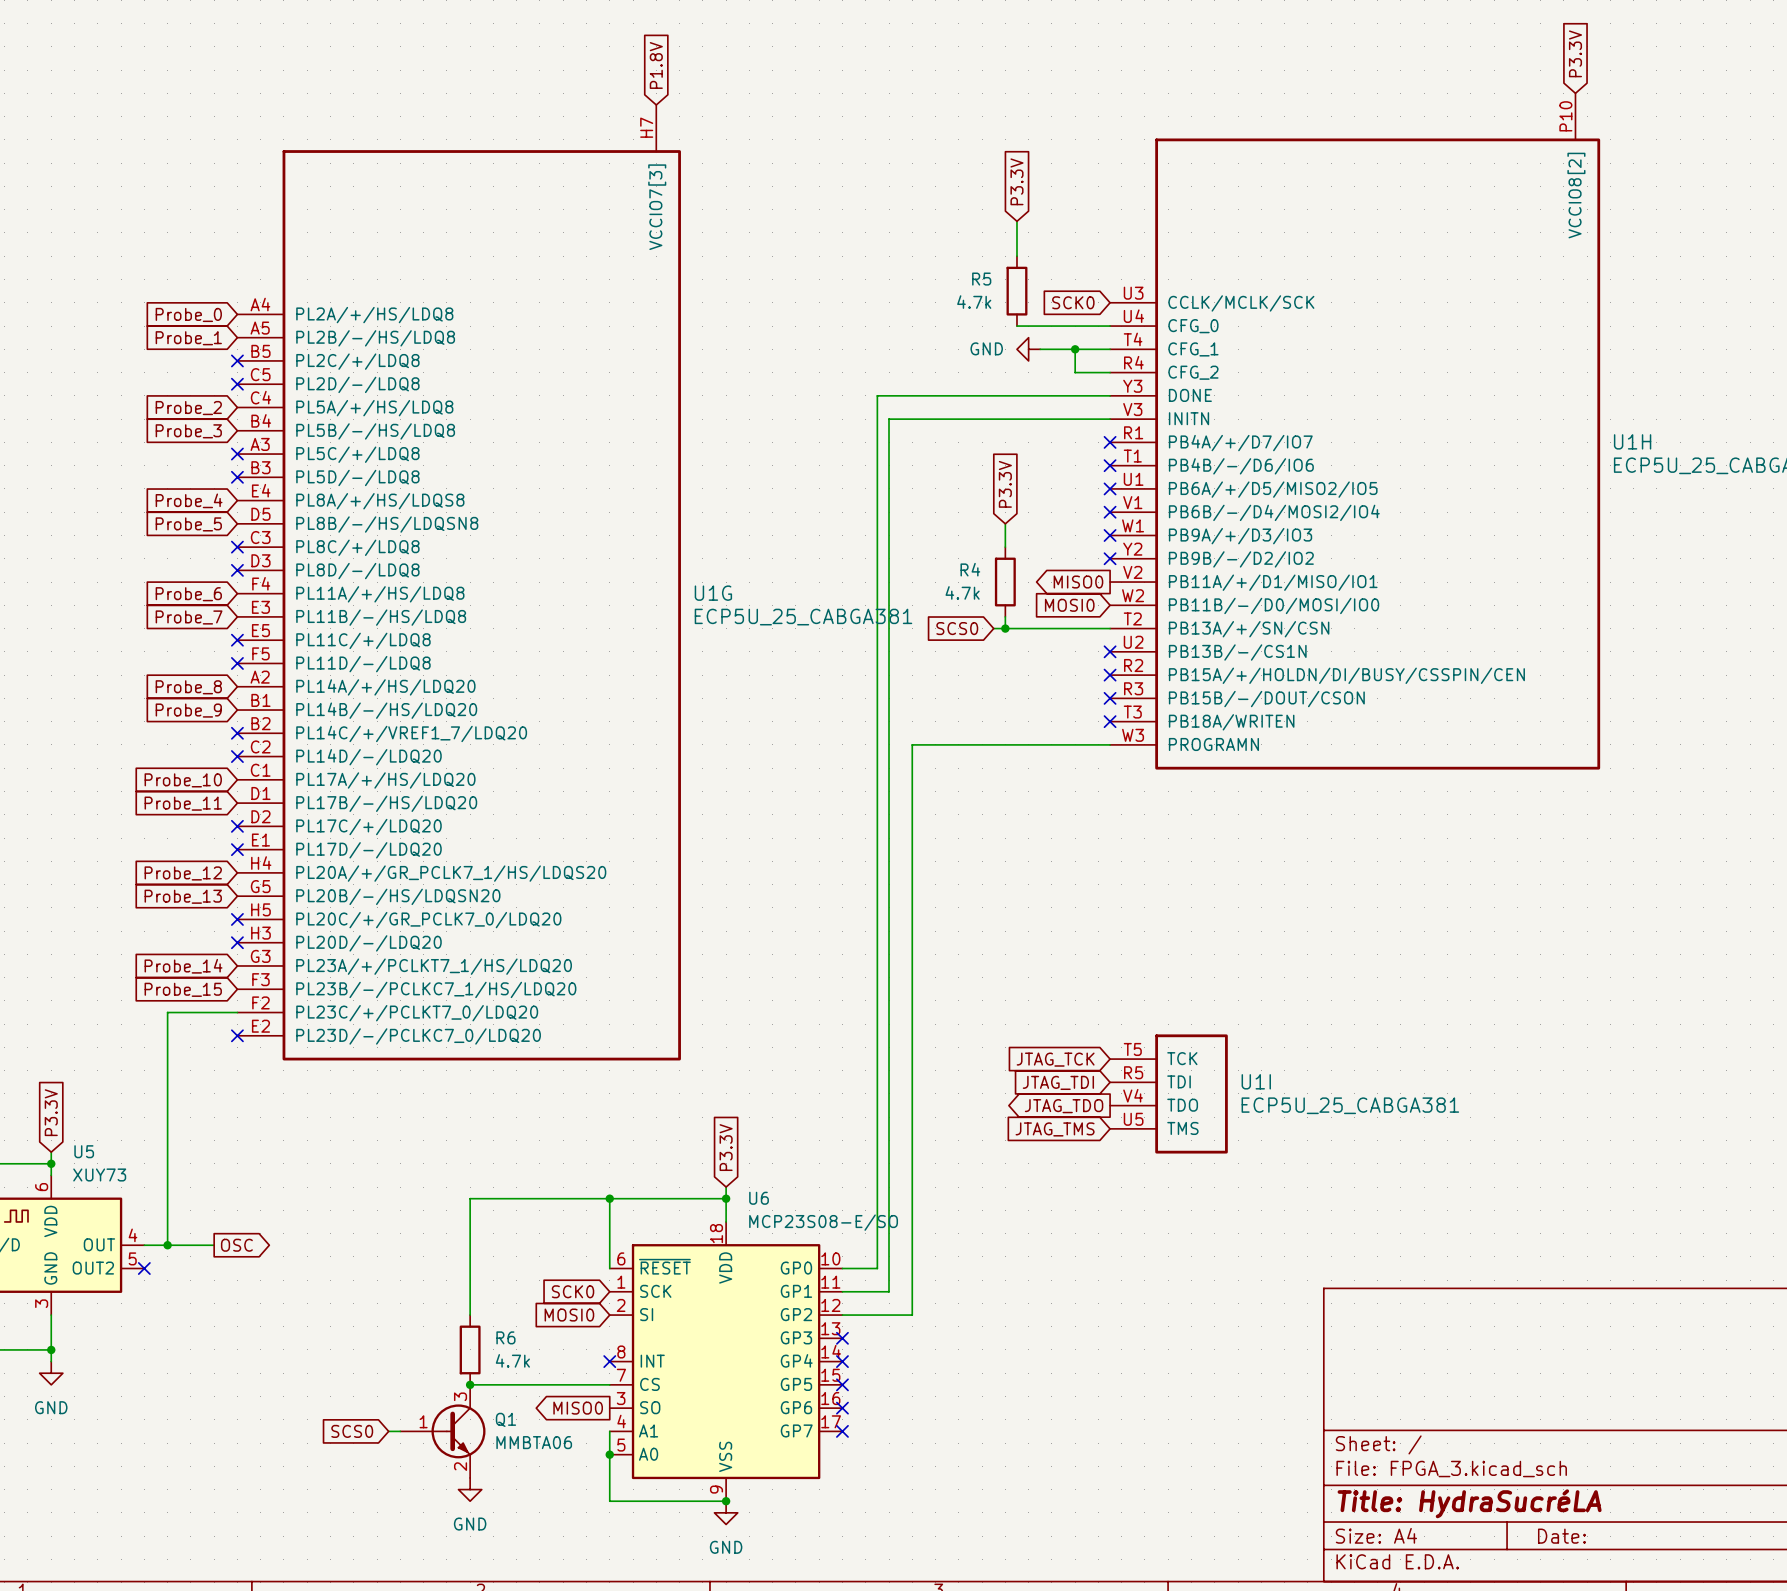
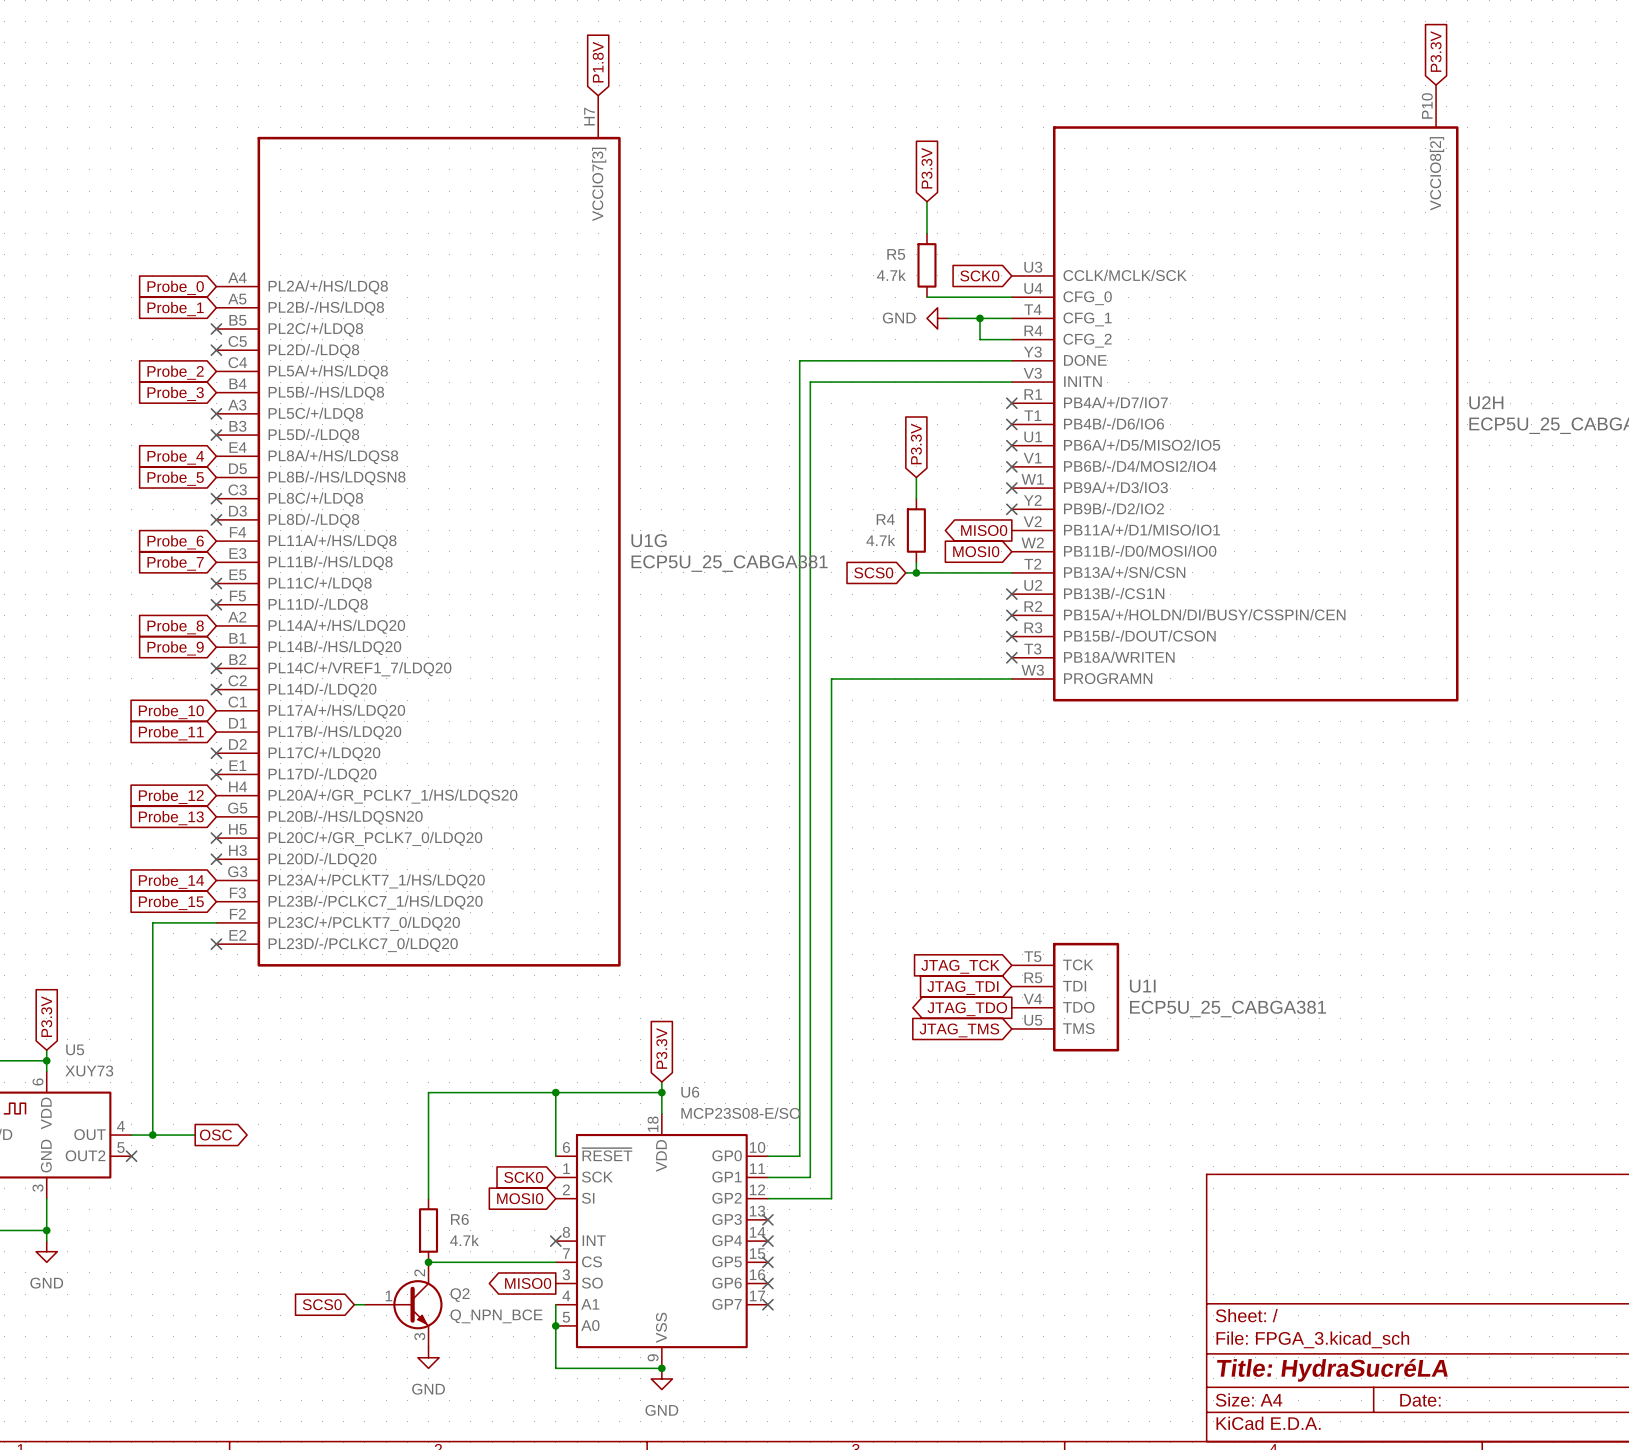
U1H name: U1H (1632, 441) -> U2H (1486, 402)
Q1: MMBTA06 (442, 1431) -> none
Q2: none -> Q_NPN_BCE (403, 1304)

